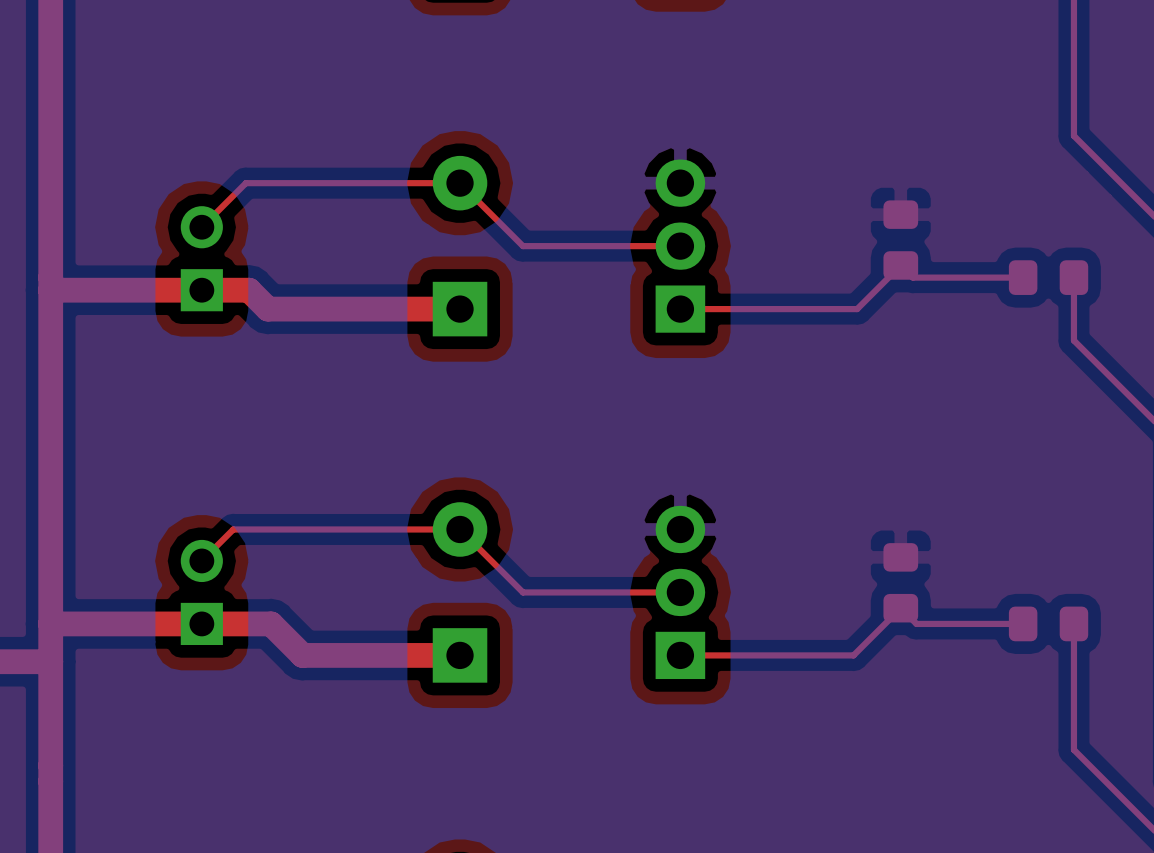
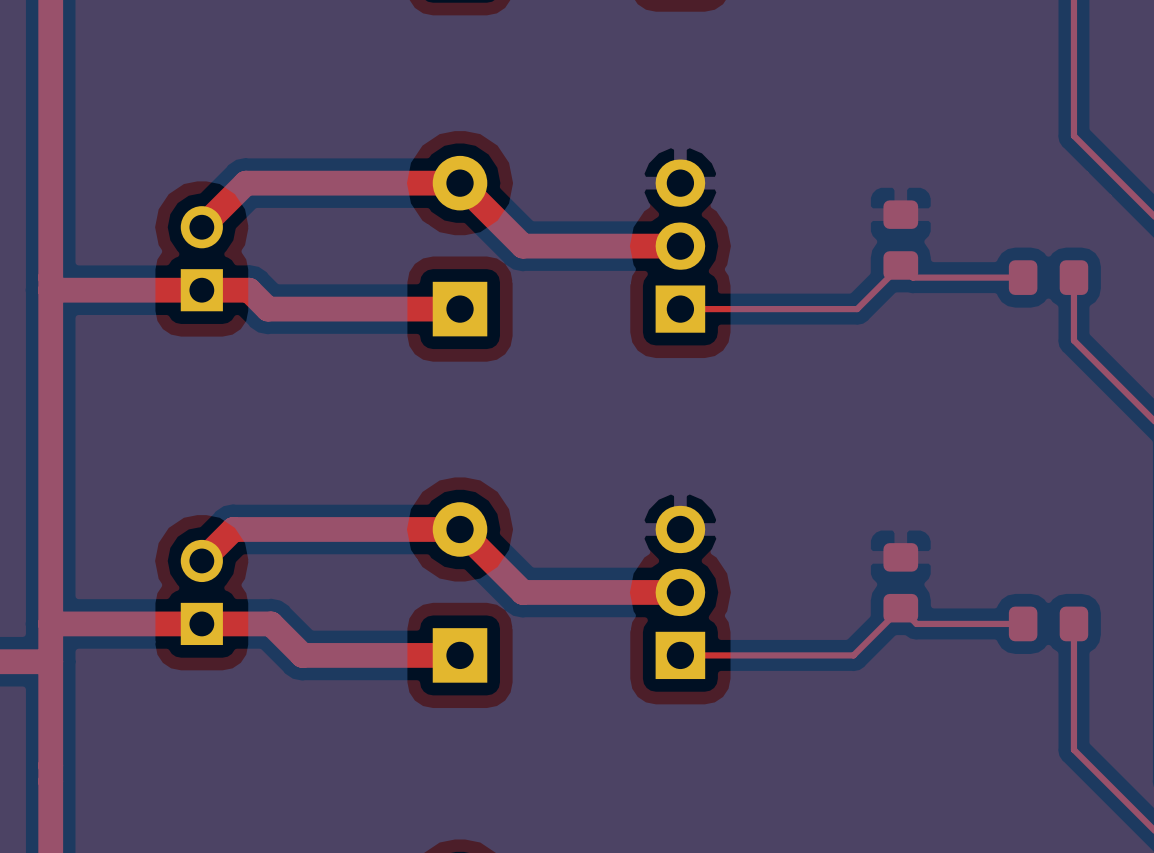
top track width: thin (201, 227) (245, 183) (460, 183) (522, 246) (680, 246) -> thick (201, 227) (245, 183) (460, 183) (522, 246) (680, 246)
top track width: thin (201, 560) (233, 529) (460, 529) (522, 592) (680, 592) -> thick (201, 560) (233, 529) (460, 529) (522, 592) (680, 592)

